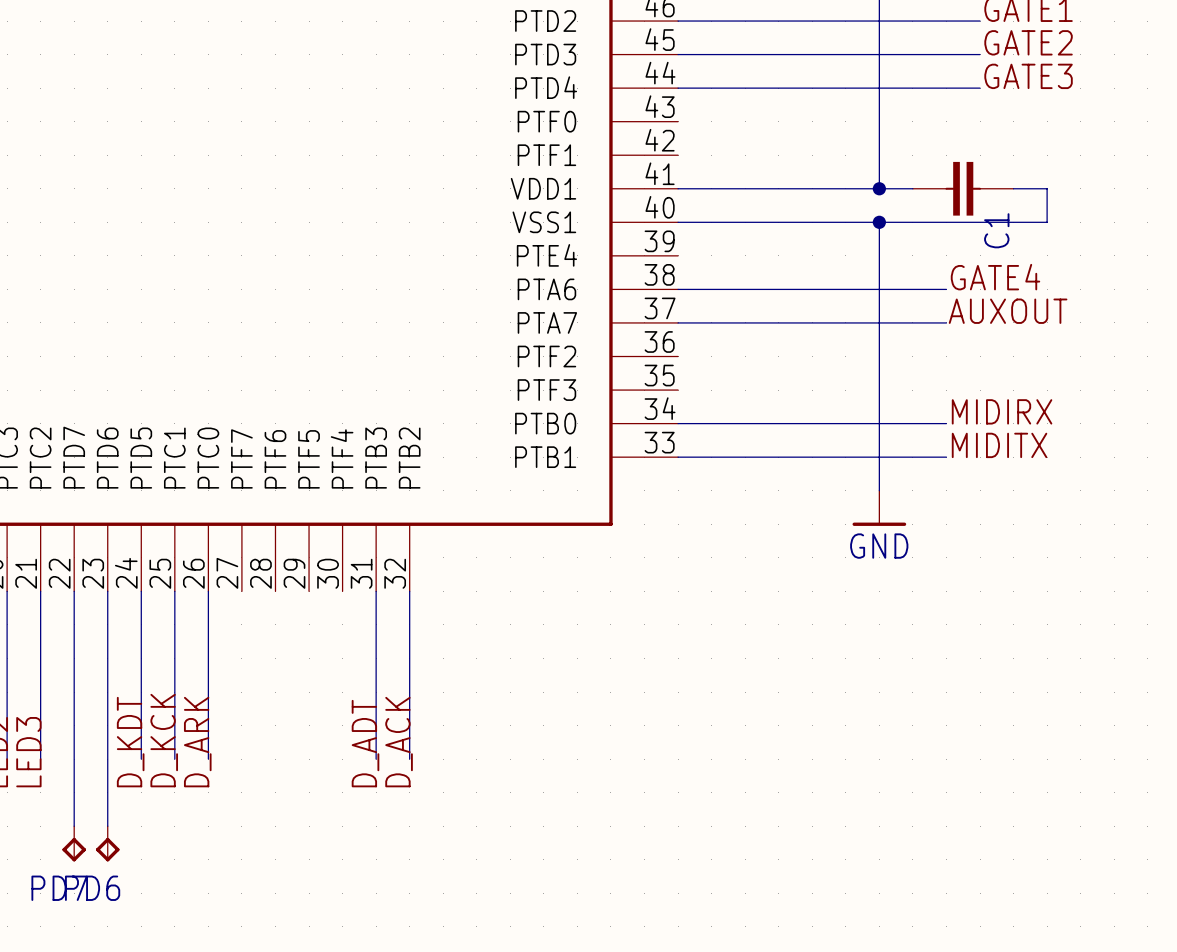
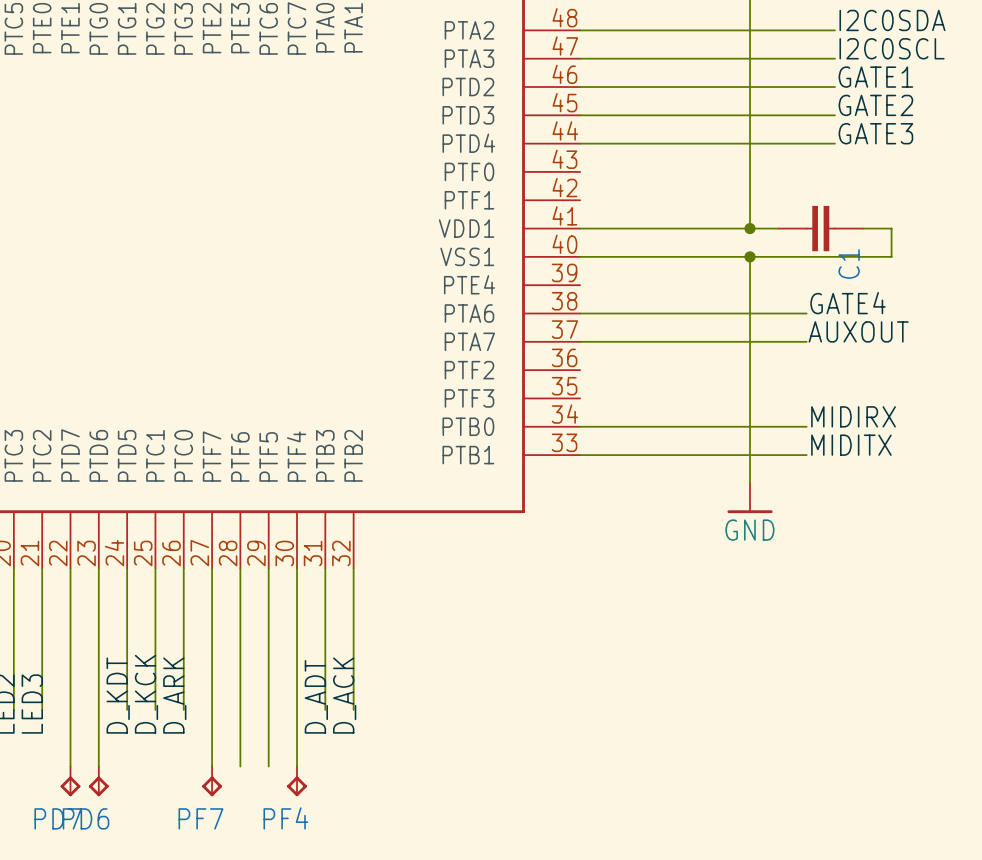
wire: none -> (212, 568) (212, 766)
wire: none -> (240, 568) (240, 766)
wire: none -> (268, 568) (268, 766)
wire: none -> (297, 568) (297, 766)
PF7: none -> (212, 781)
PF4: none -> (297, 781)

